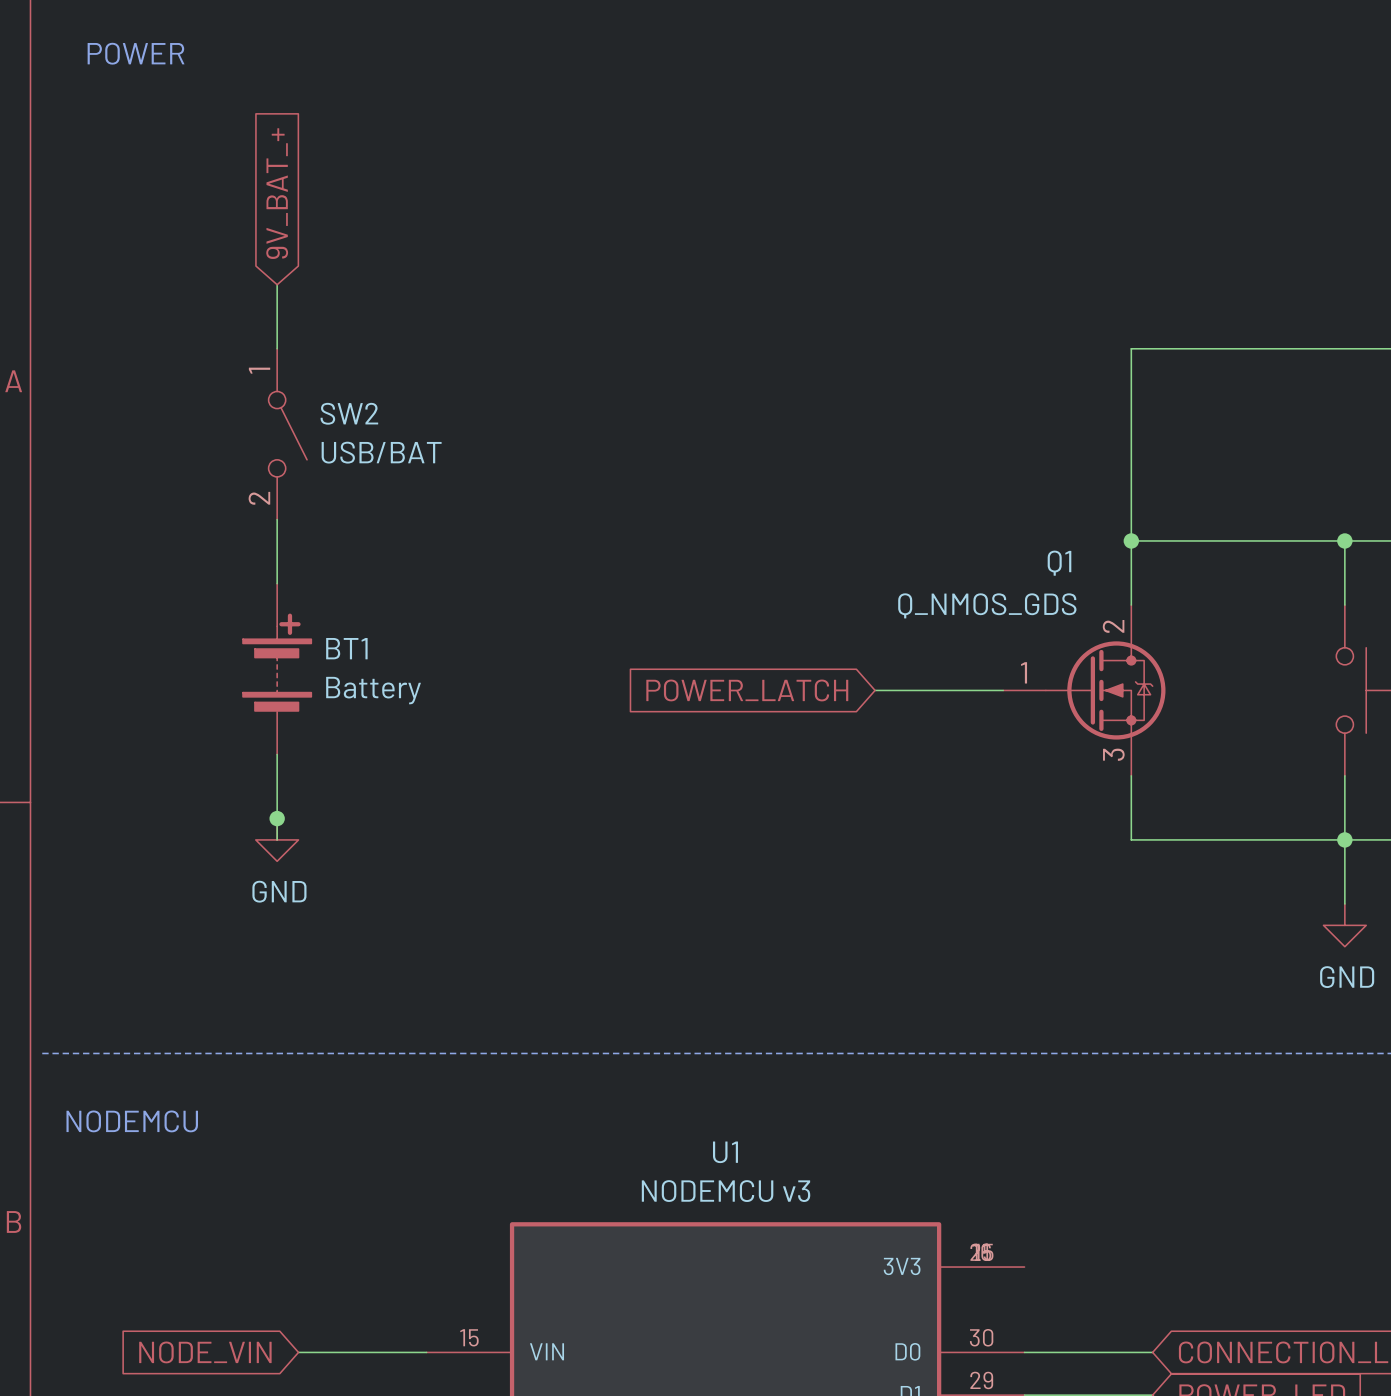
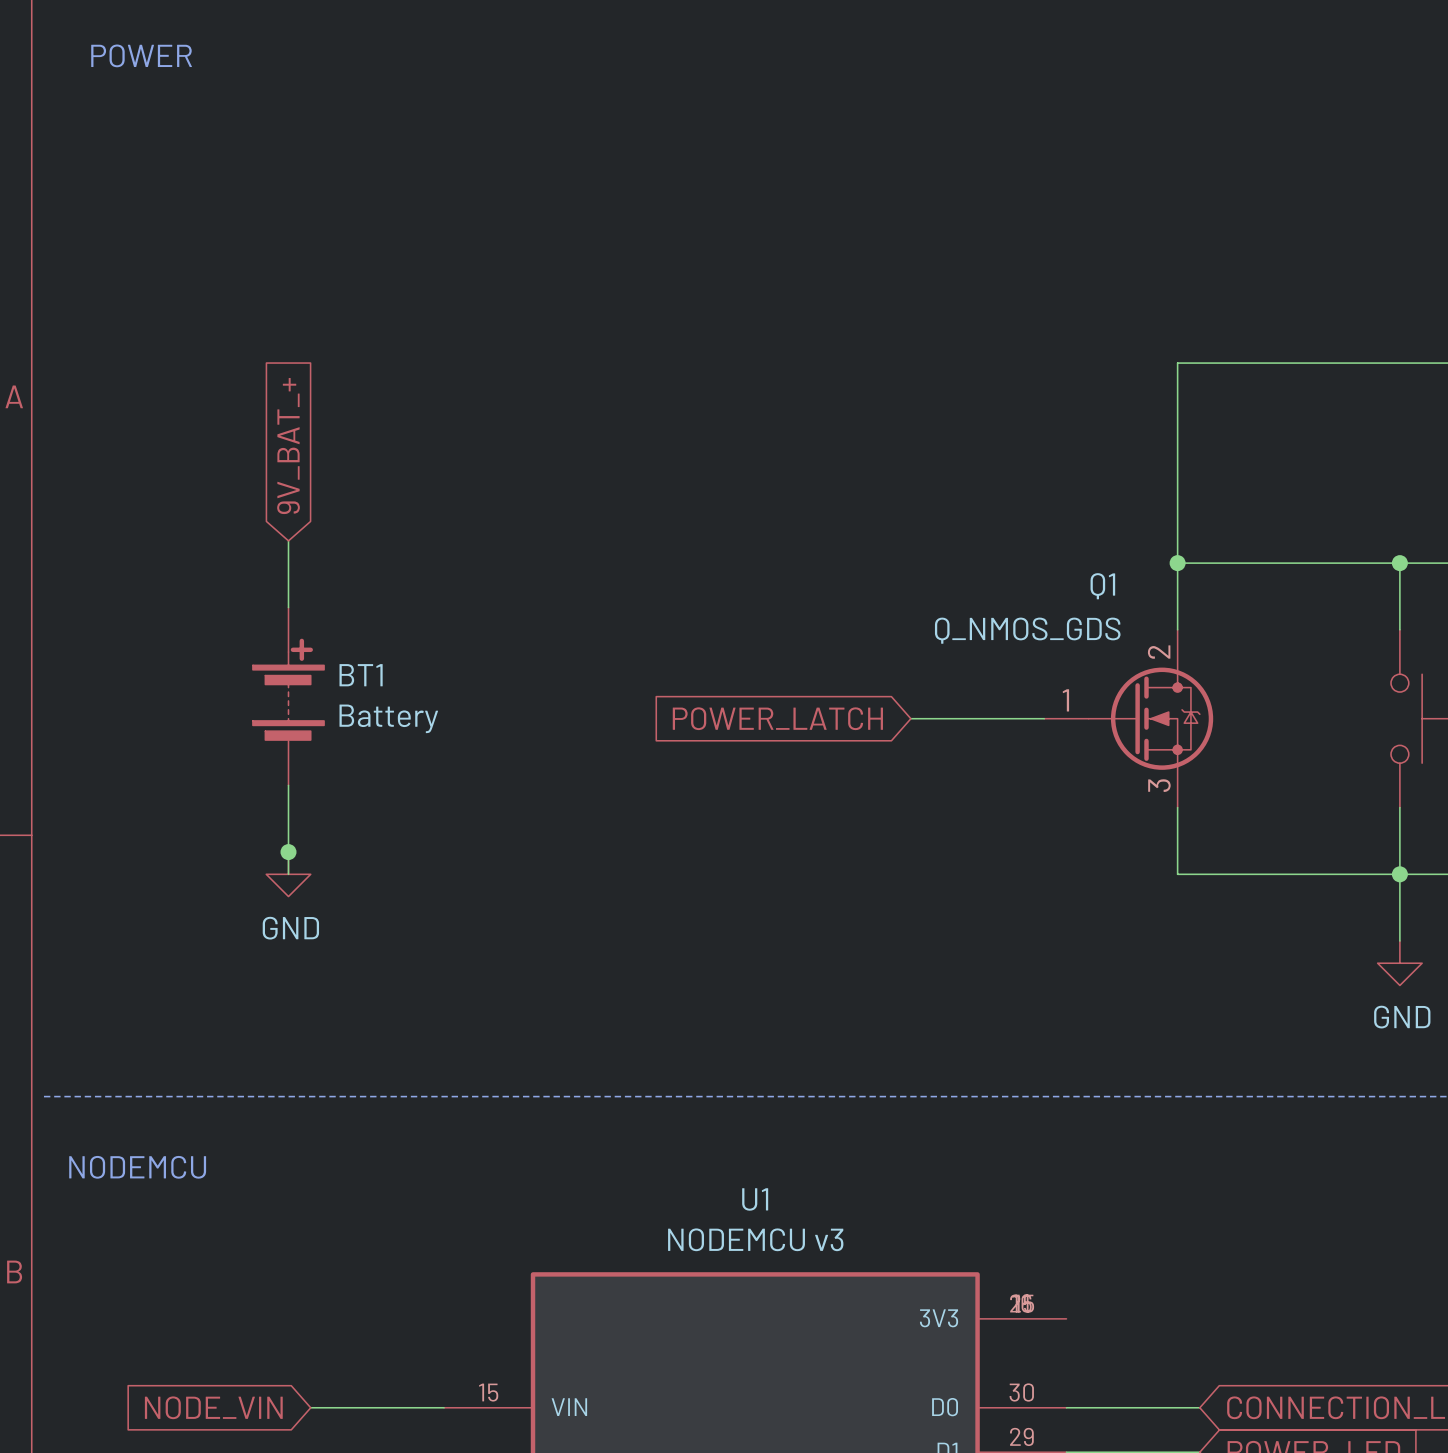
global label position: 9V_BAT_+ (277, 193) -> 9V_BAT_+ (288, 446)
wire: (277, 284) (277, 348) -> none
SW2: USB/BAT (287, 434) -> none

